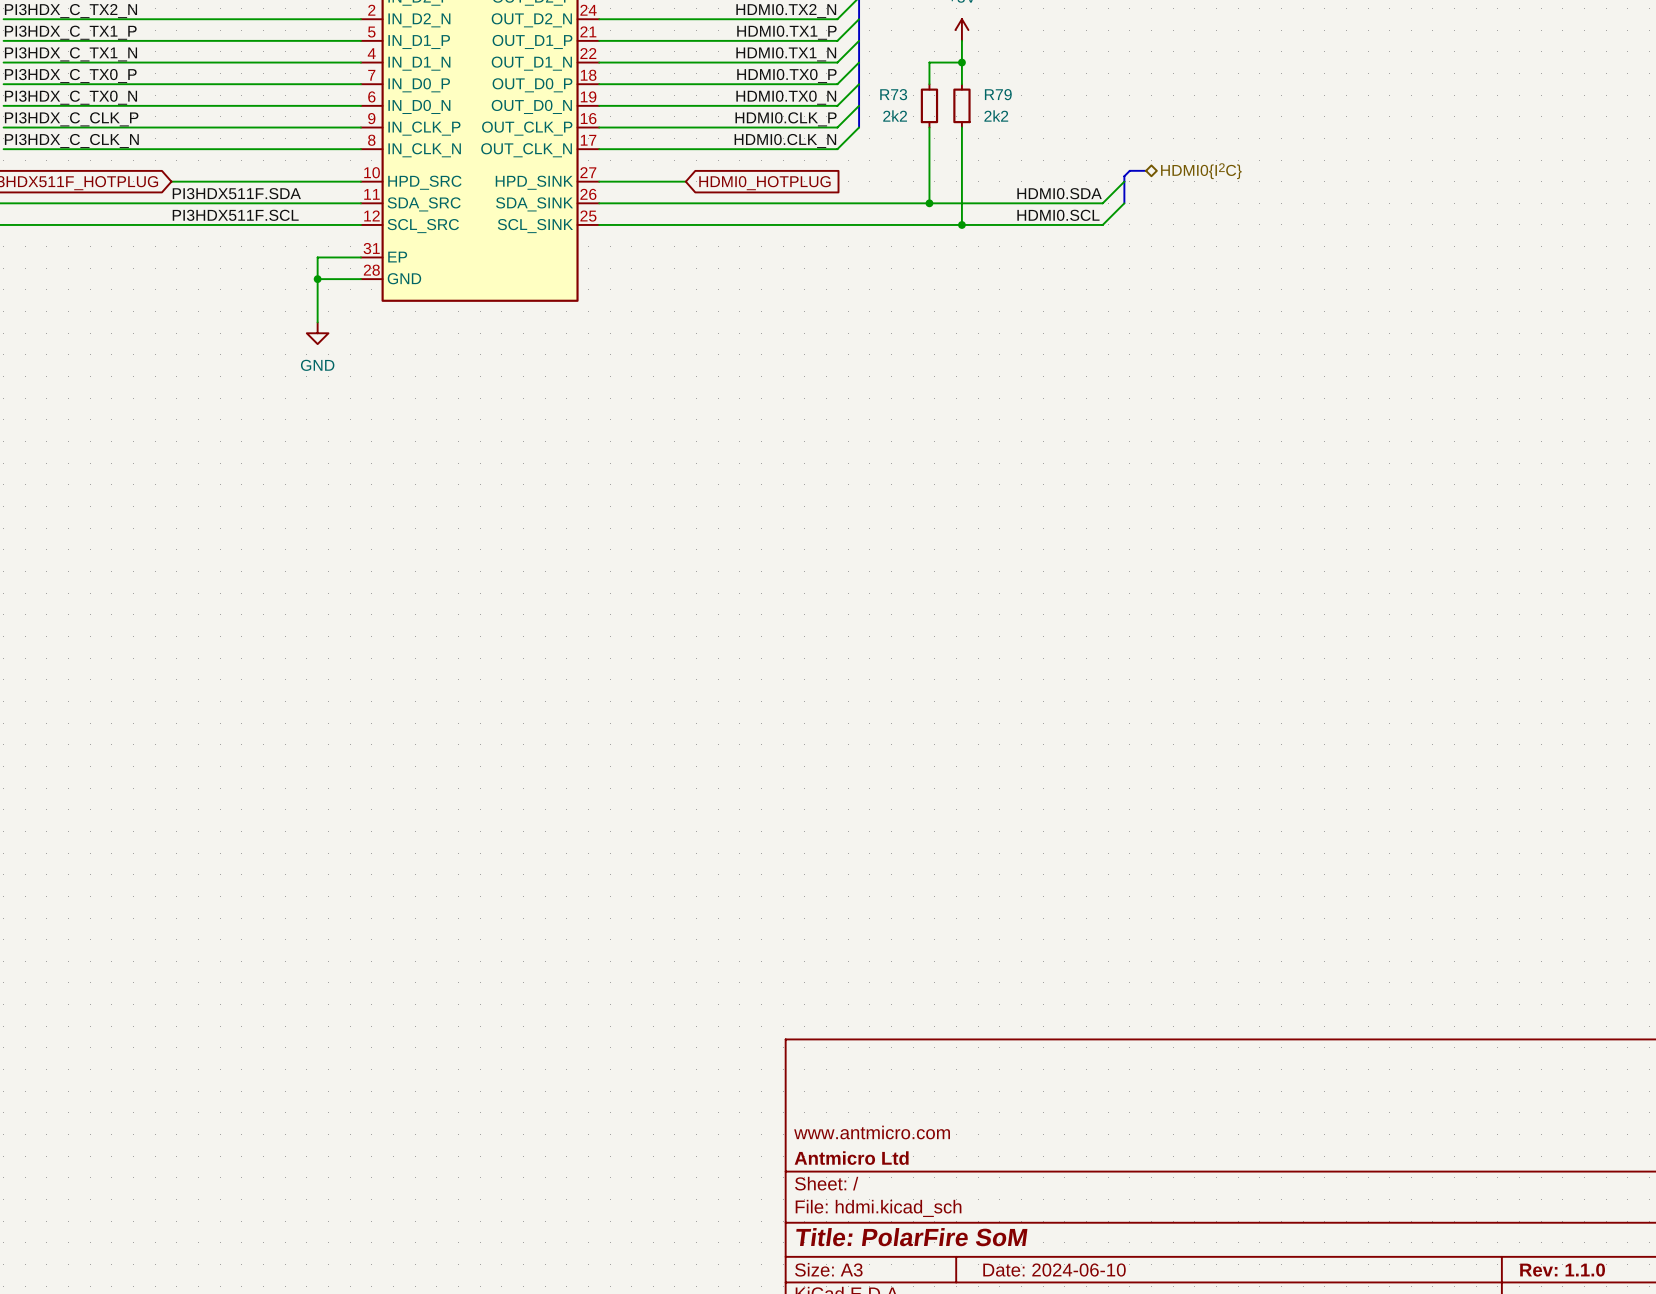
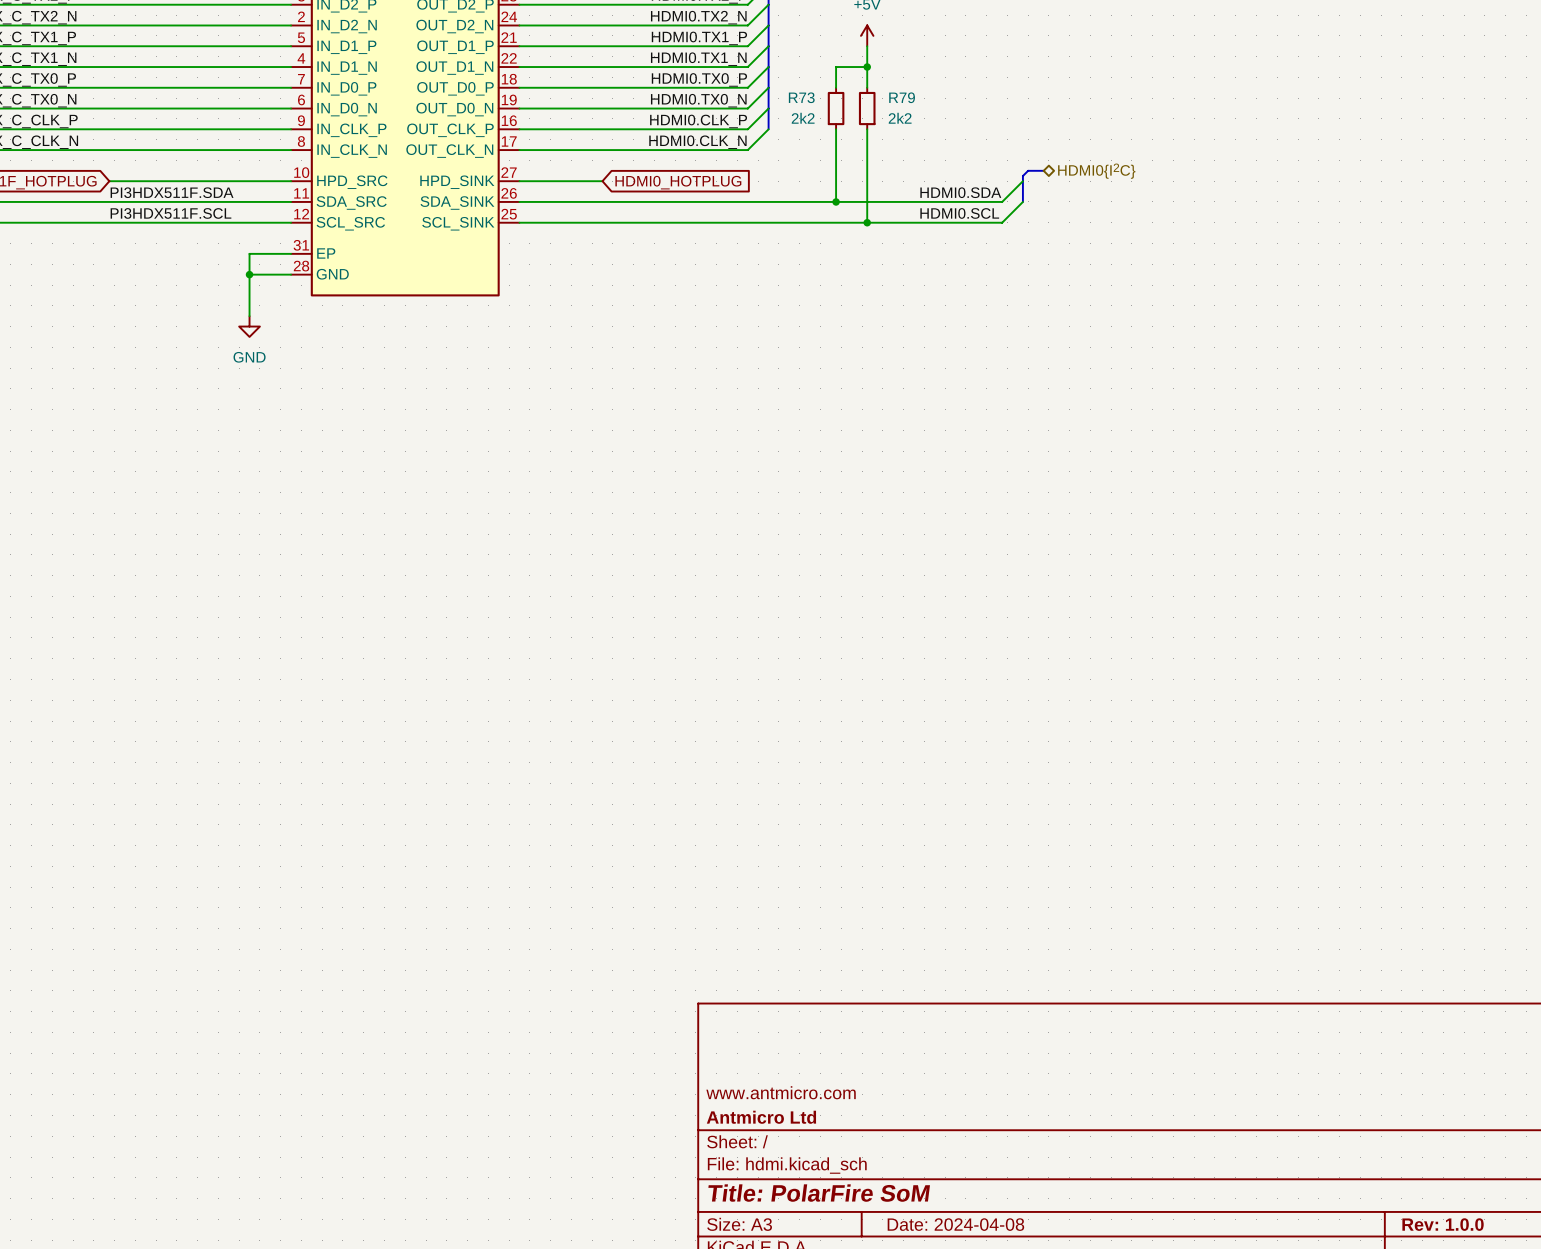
title block: Date: 2024-06-10 (1054, 1270) -> Date: 2024-04-08 (955, 1224)
title block: Rev: 1.1.0 (1562, 1270) -> Rev: 1.0.0 (1443, 1224)

